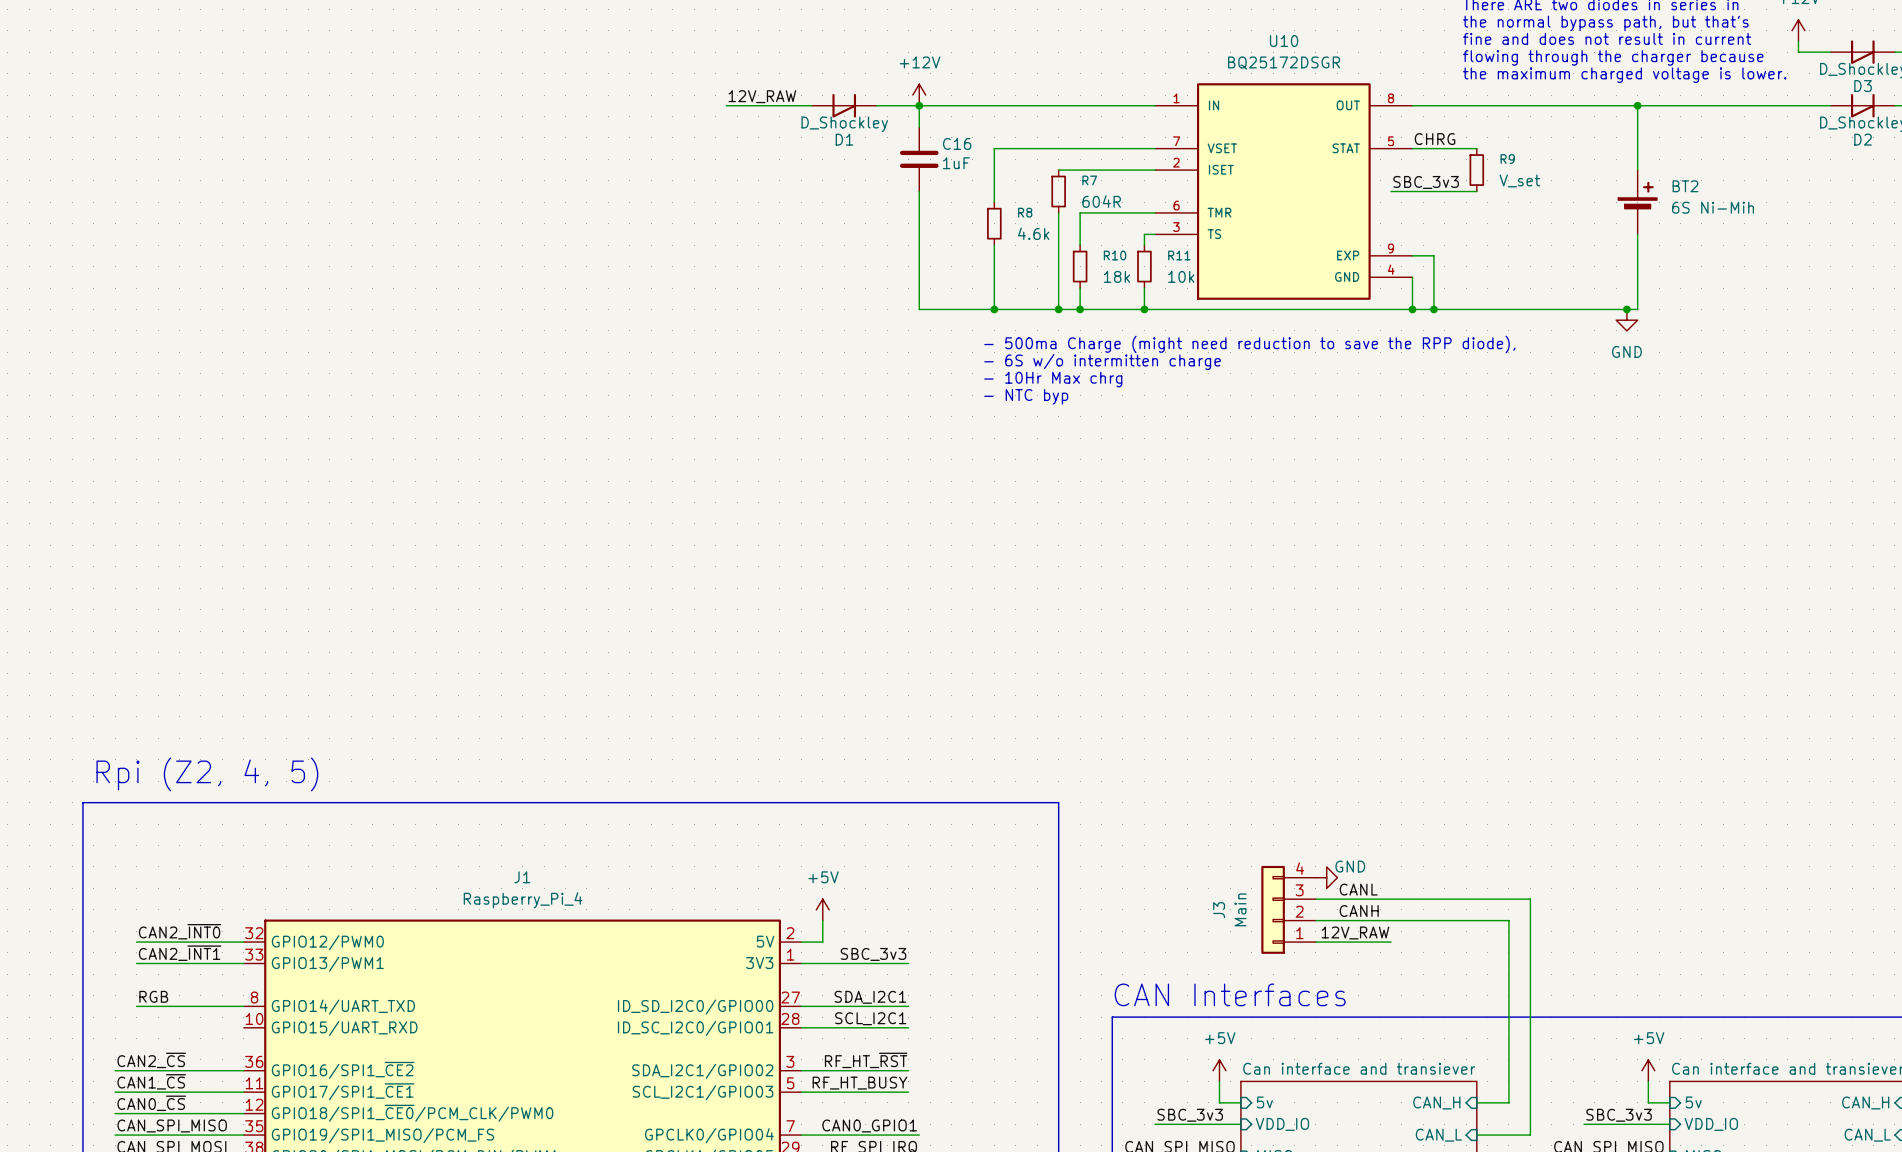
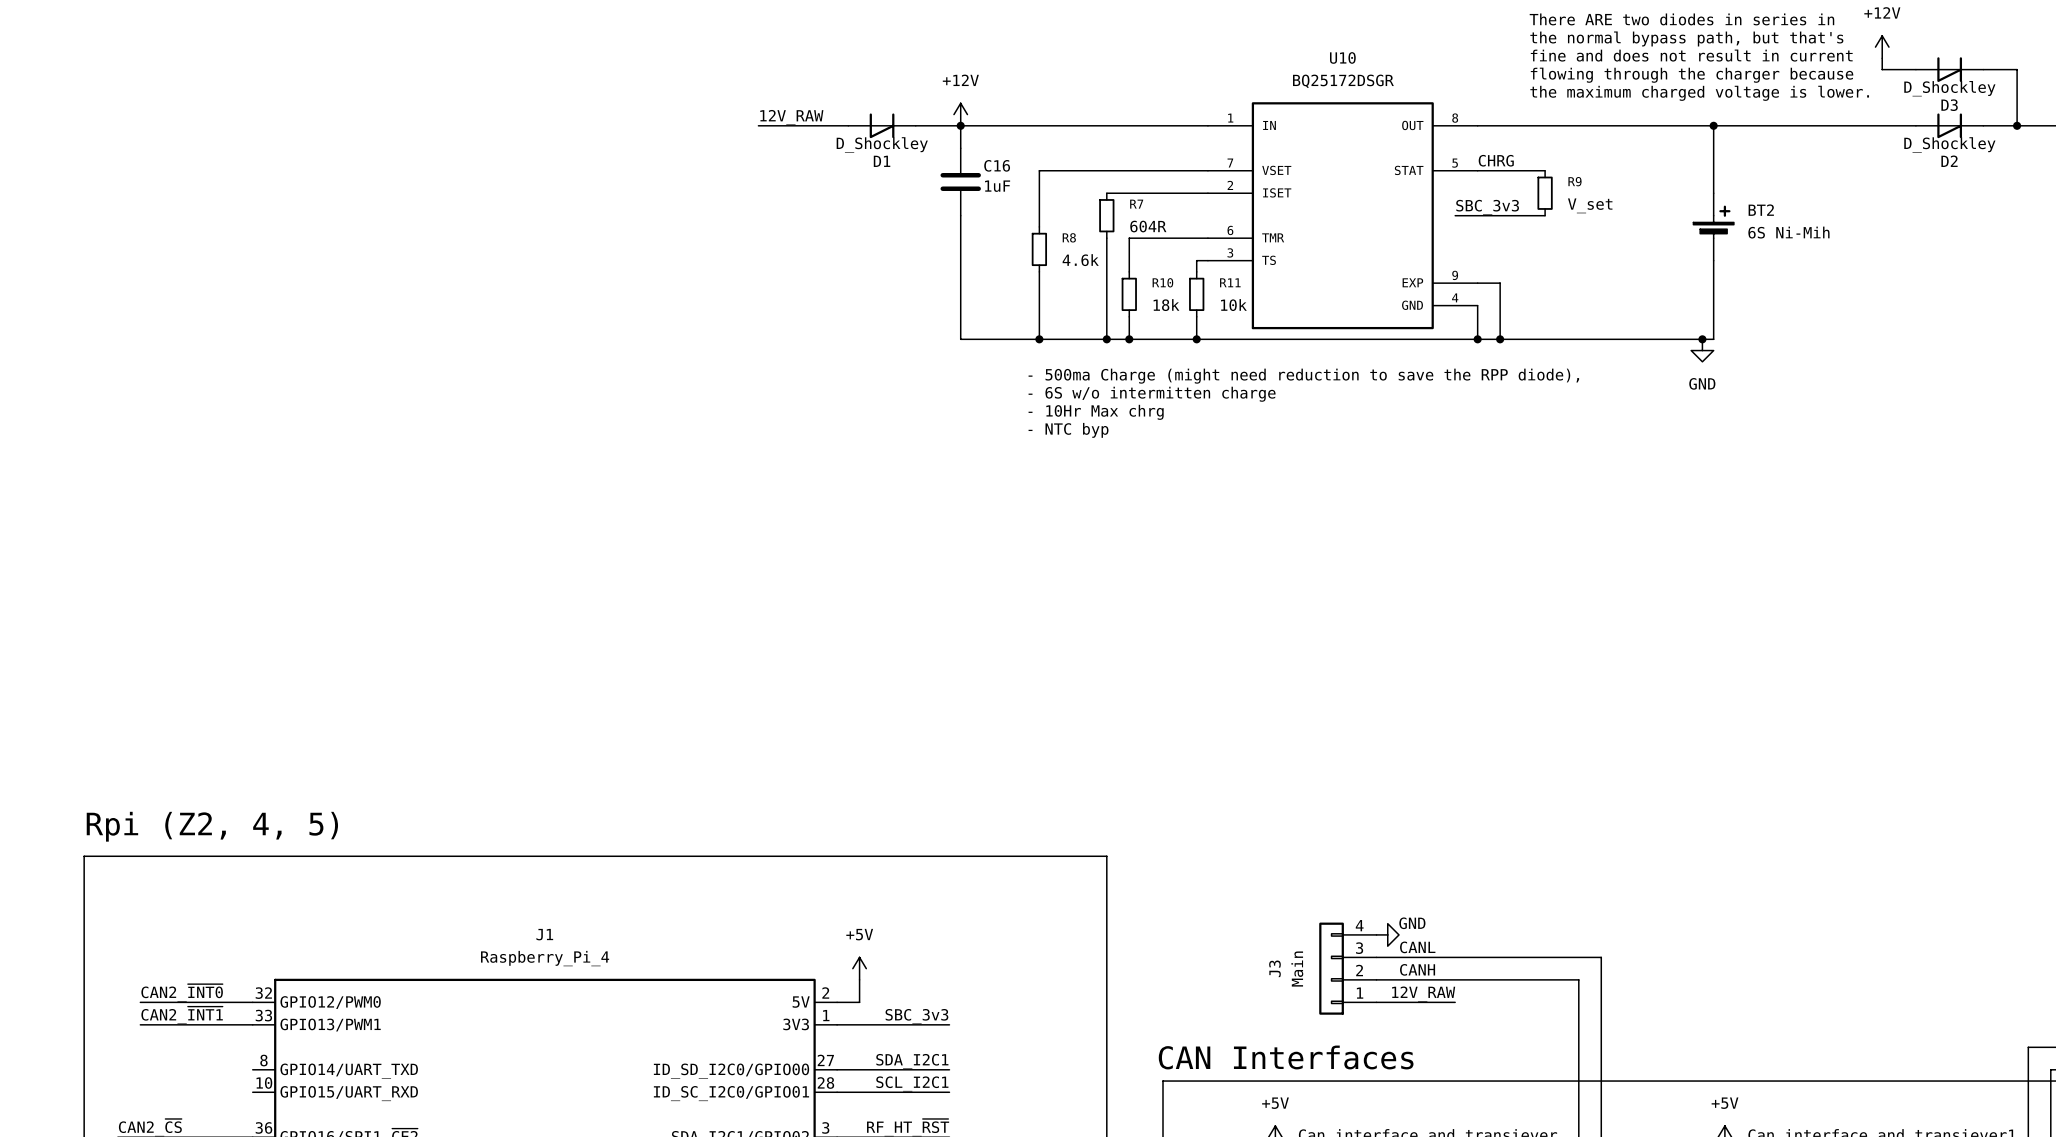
label: RGB (153, 996) -> none
wire: (136, 1006) (243, 1006) -> none

